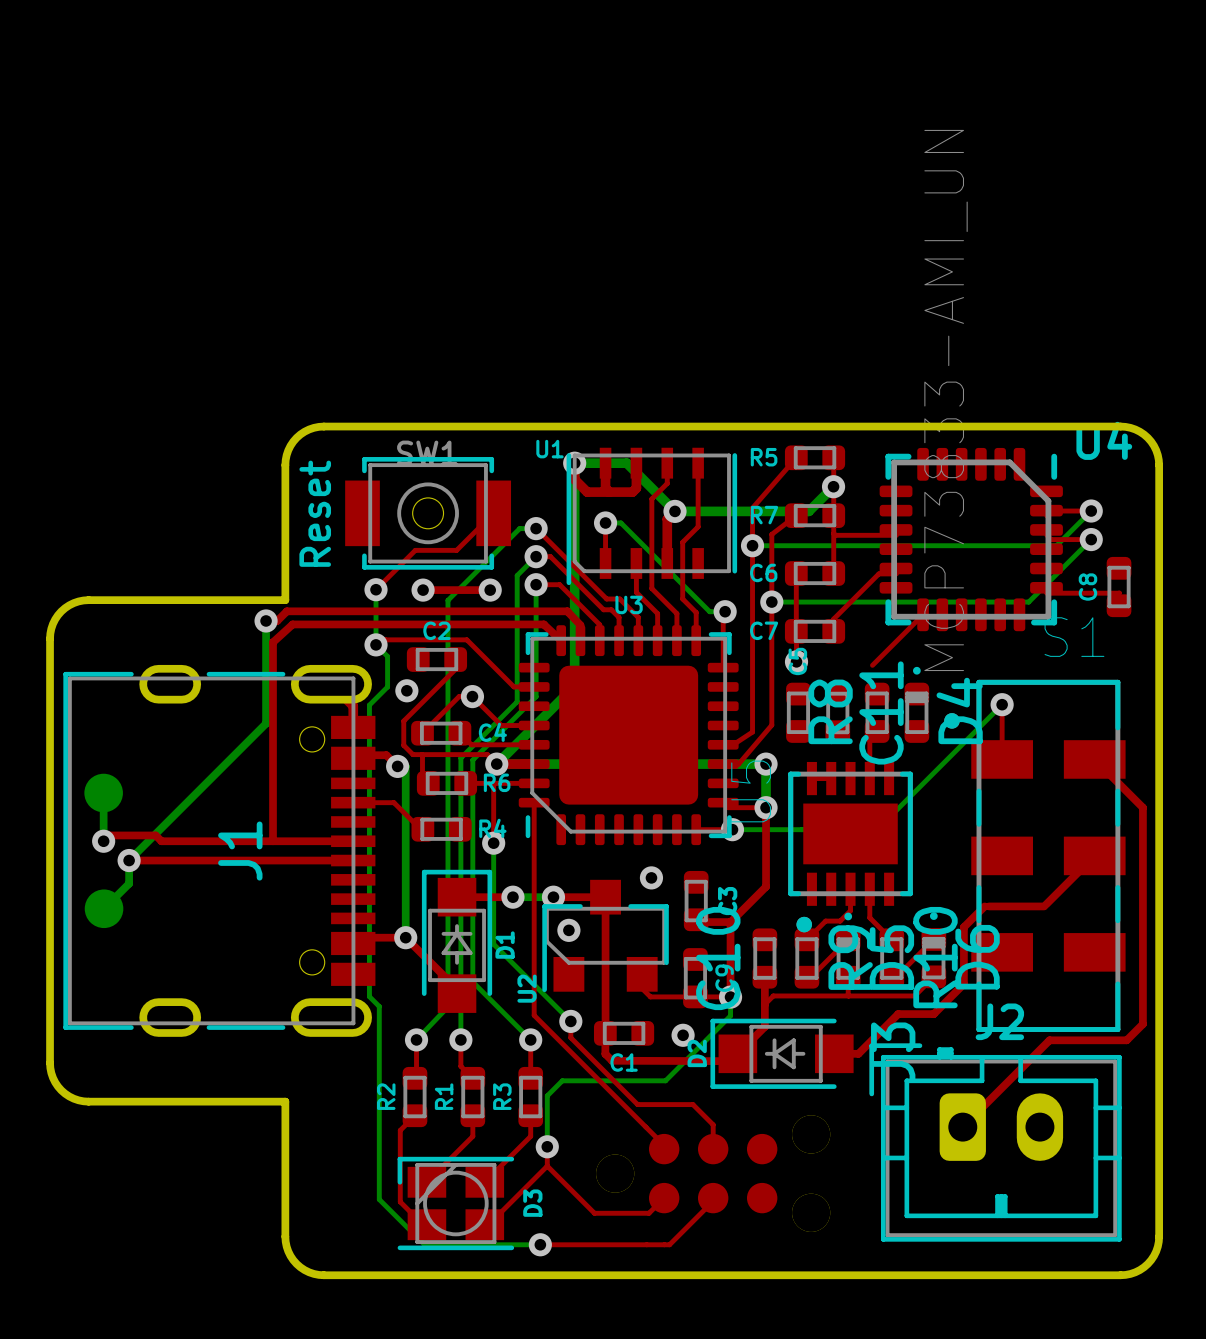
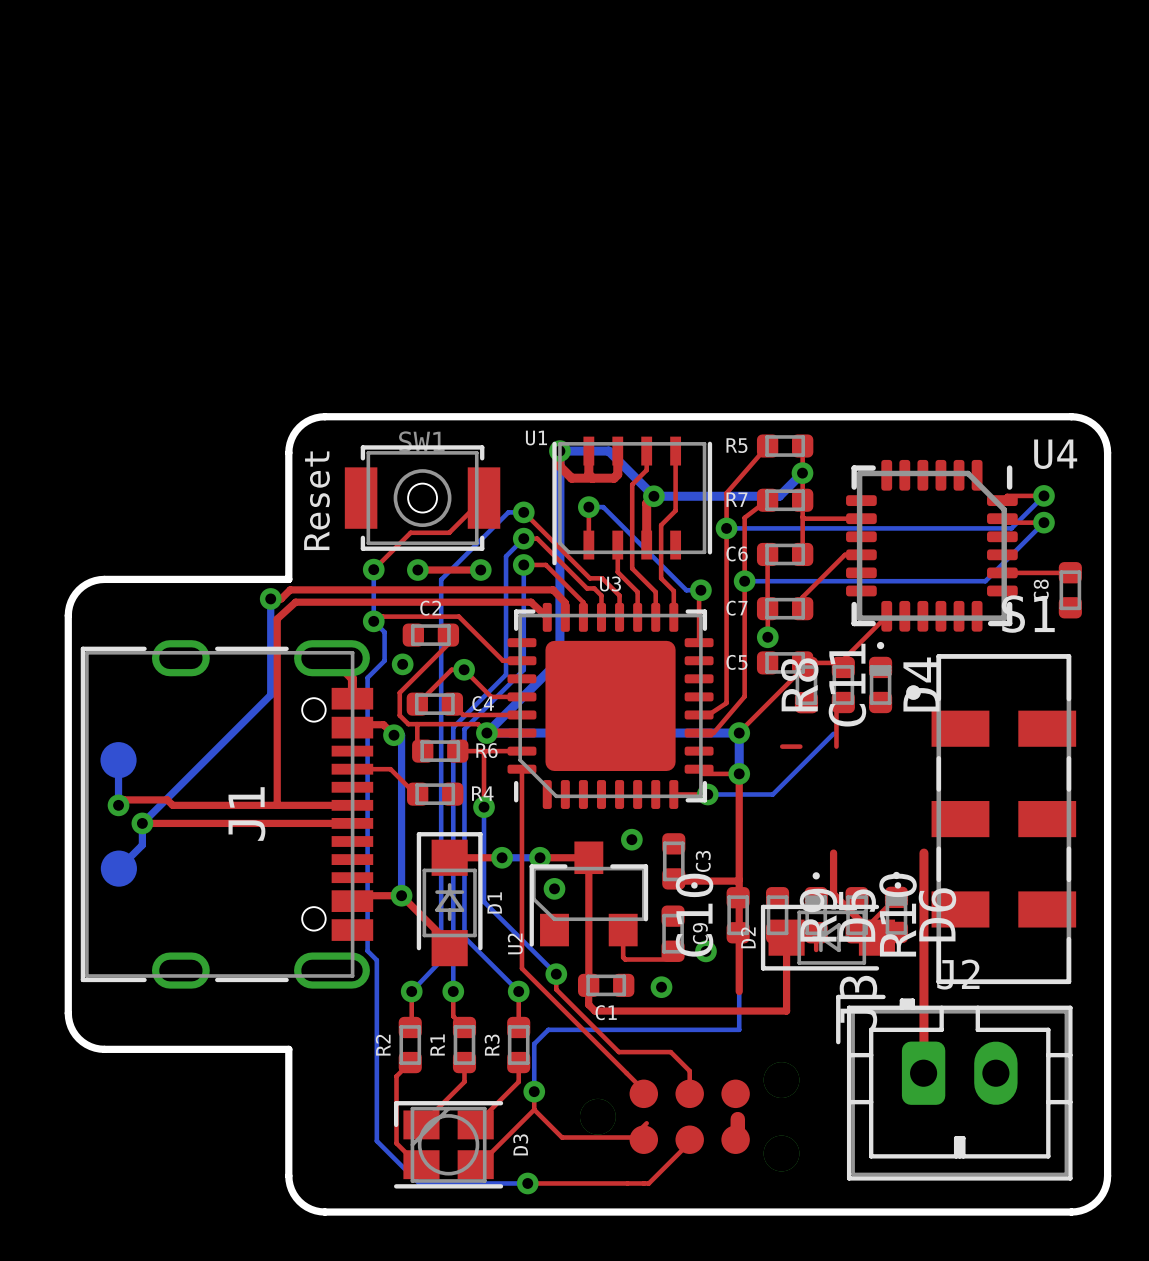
U4 position: (971, 539) -> (931, 545)
C8 position: (1119, 587) -> (1070, 590)
top track: (923, 614) (872, 665) -> none
top track: none -> (886, 616) (840, 662) (802, 662) (802, 668) (739, 732)
top track: (1002, 704) (1002, 759) -> none
bottom track: (1002, 704) (877, 829) (801, 829) -> (833, 733) (772, 794)
via: (1002, 704) -> none
C5 rotation: 0° (798, 712) -> 90° clockwise (785, 662)
top track: (1094, 759) (1142, 807) (1142, 1024) (1126, 1040) (1049, 1040) (962, 1127) -> none
U5: MCP73833-AMI_UN (850, 847) -> none
top track: (1094, 855) (1044, 906) (984, 906) (963, 927) (963, 984) (933, 1014) (898, 1014) (858, 1053) (834, 1053) -> none
top track: (766, 886) (730, 922) (730, 997) (650, 996) (642, 988) -> (739, 848) (739, 991)
top track: (850, 889) (850, 910) (840, 921) (825, 921) (806, 939) -> none
top track: (869, 889) (869, 917) (891, 939) -> none
top track: none -> (833, 853) (833, 894) (876, 937)
top track: none -> (923, 853) (923, 1065)
top track: none -> (739, 879) (705, 881)
top track: (848, 939) (810, 977) (806, 977) -> none
top track: (933, 976) (914, 995) (773, 995) (764, 1004) -> none
top track: (764, 977) (764, 1026) (737, 1053) (734, 1053) (726, 1061) (612, 1060) -> (786, 937) (786, 1011) (594, 1011)
top track: none -> (623, 943) (623, 957) (625, 959) (678, 959)
bottom track: (730, 997) (730, 1015) (665, 1080) -> (739, 991) (739, 1029) (645, 1029)
D2 position: (782, 1053) -> (827, 937)
top track: none -> (737, 1119) (737, 1139)
top track: (576, 1195) (594, 1213) (649, 1213) (664, 1198) -> (562, 1137) (632, 1137) (646, 1123)

